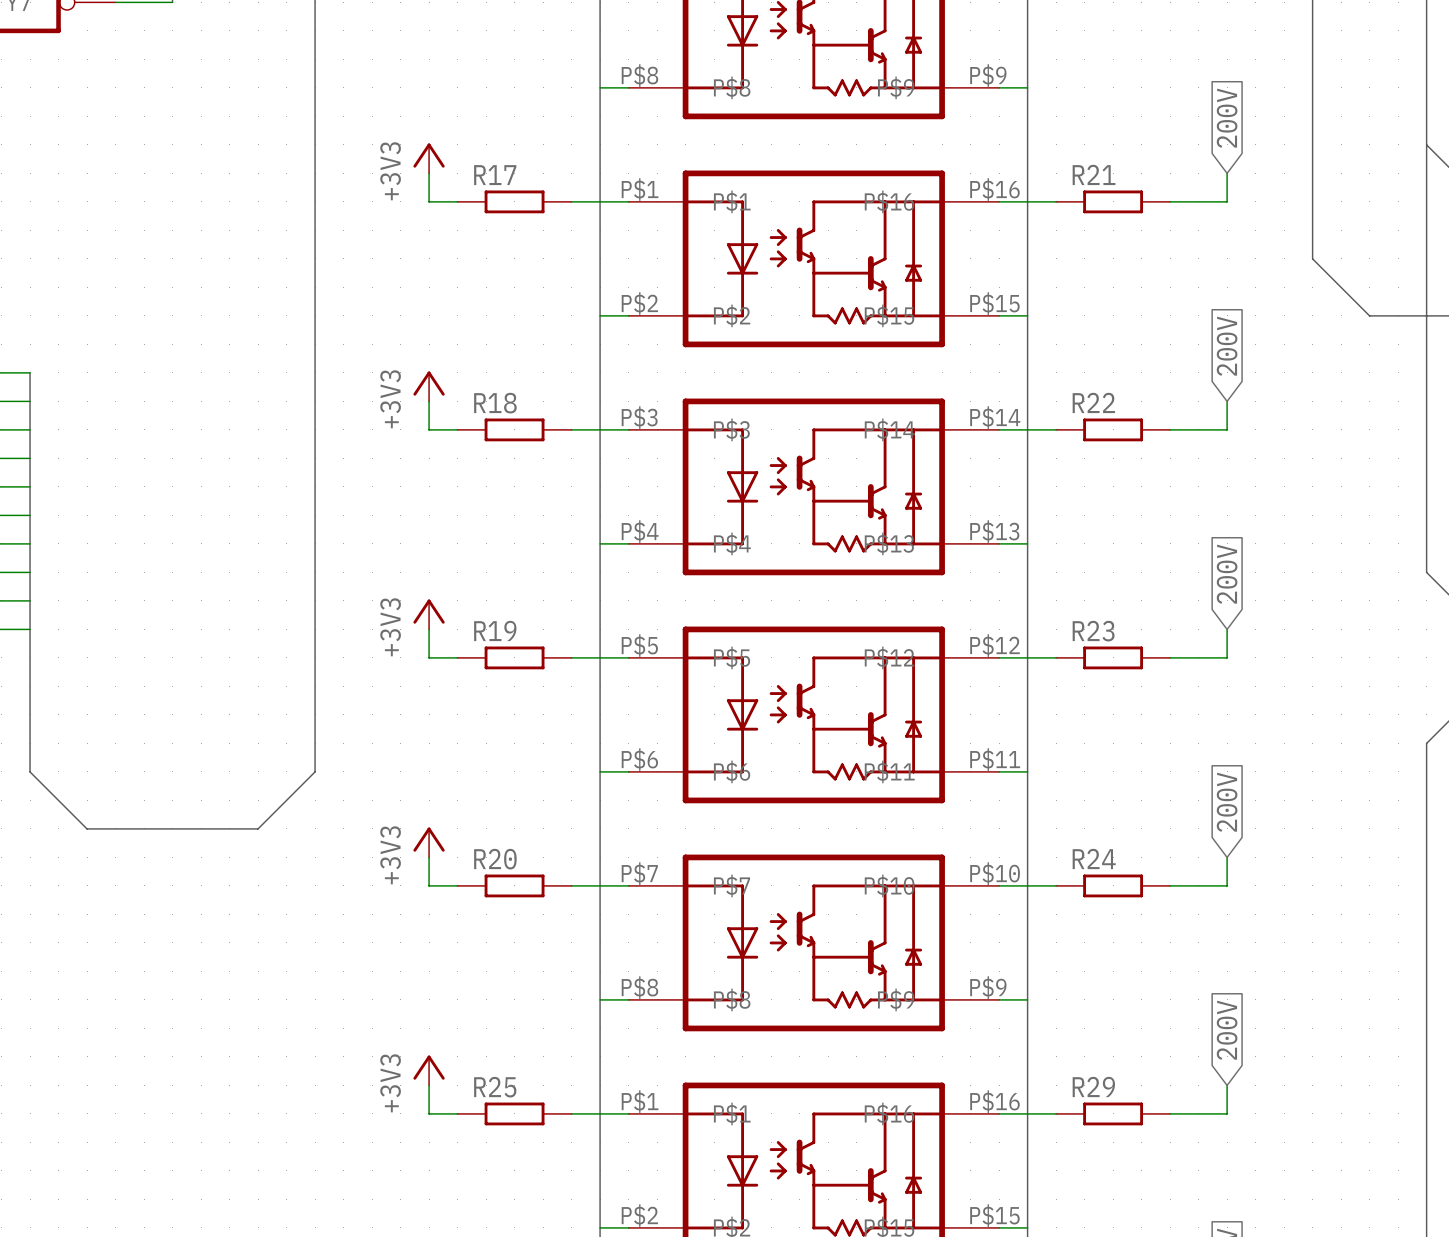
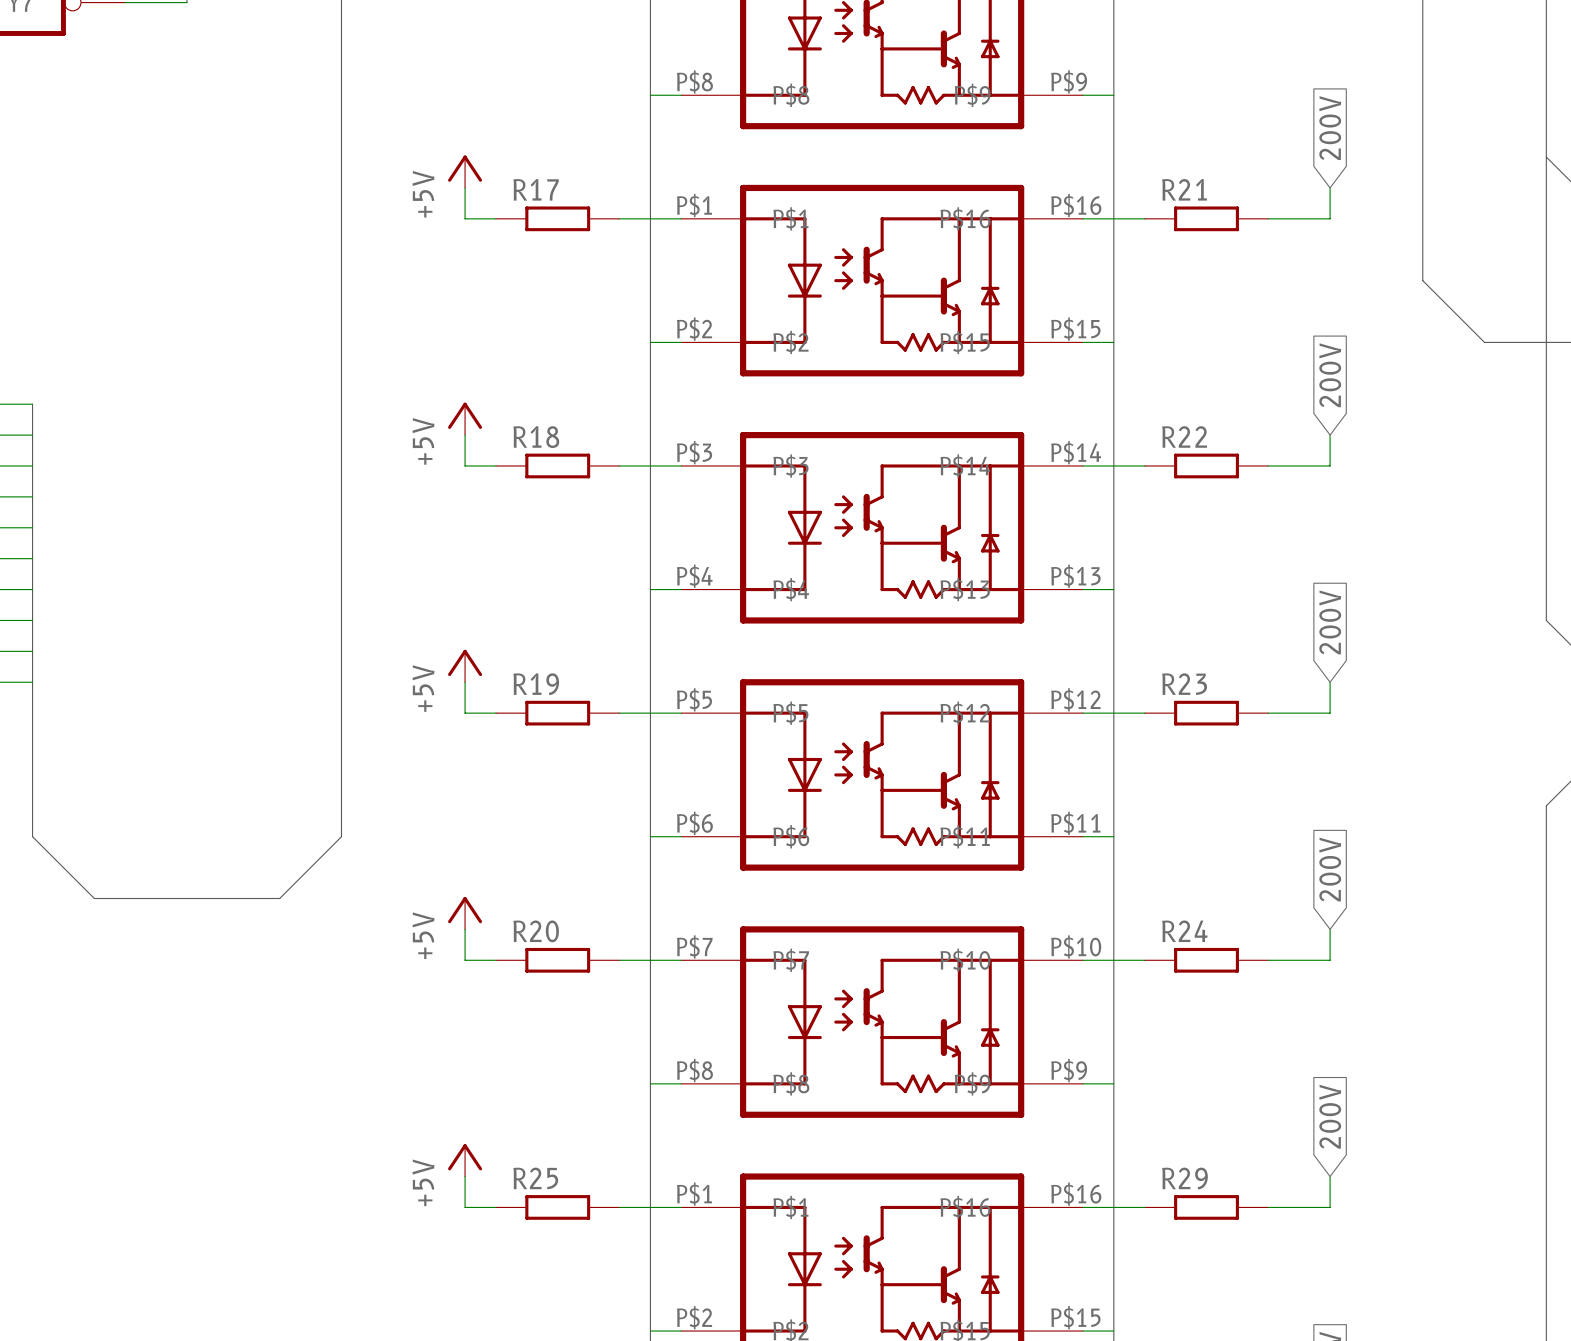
power symbol: +3V3 (429, 158) -> +5V (465, 171)
power symbol: +3V3 (429, 386) -> +5V (465, 418)
power symbol: +3V3 (429, 614) -> +5V (465, 666)
power symbol: +3V3 (429, 842) -> +5V (465, 913)
power symbol: +3V3 (429, 1070) -> +5V (465, 1160)

